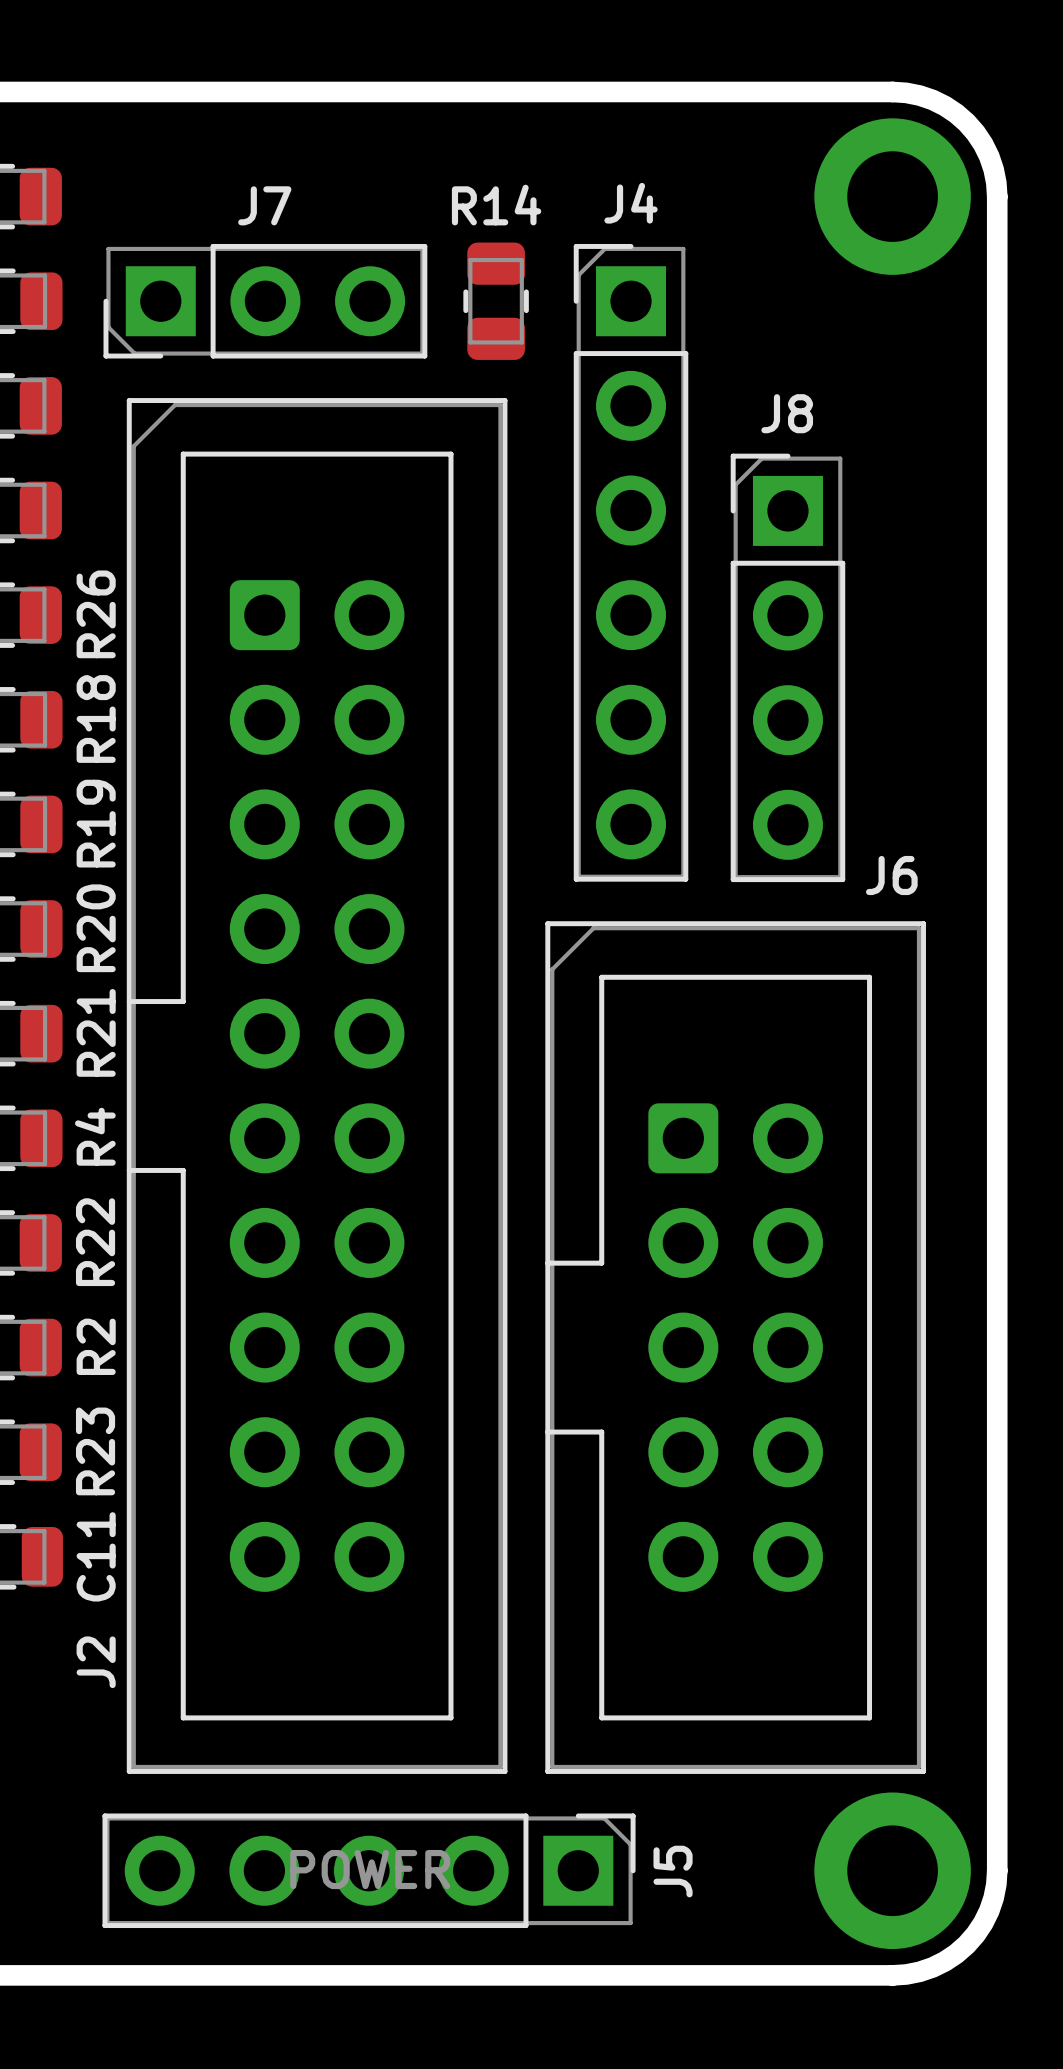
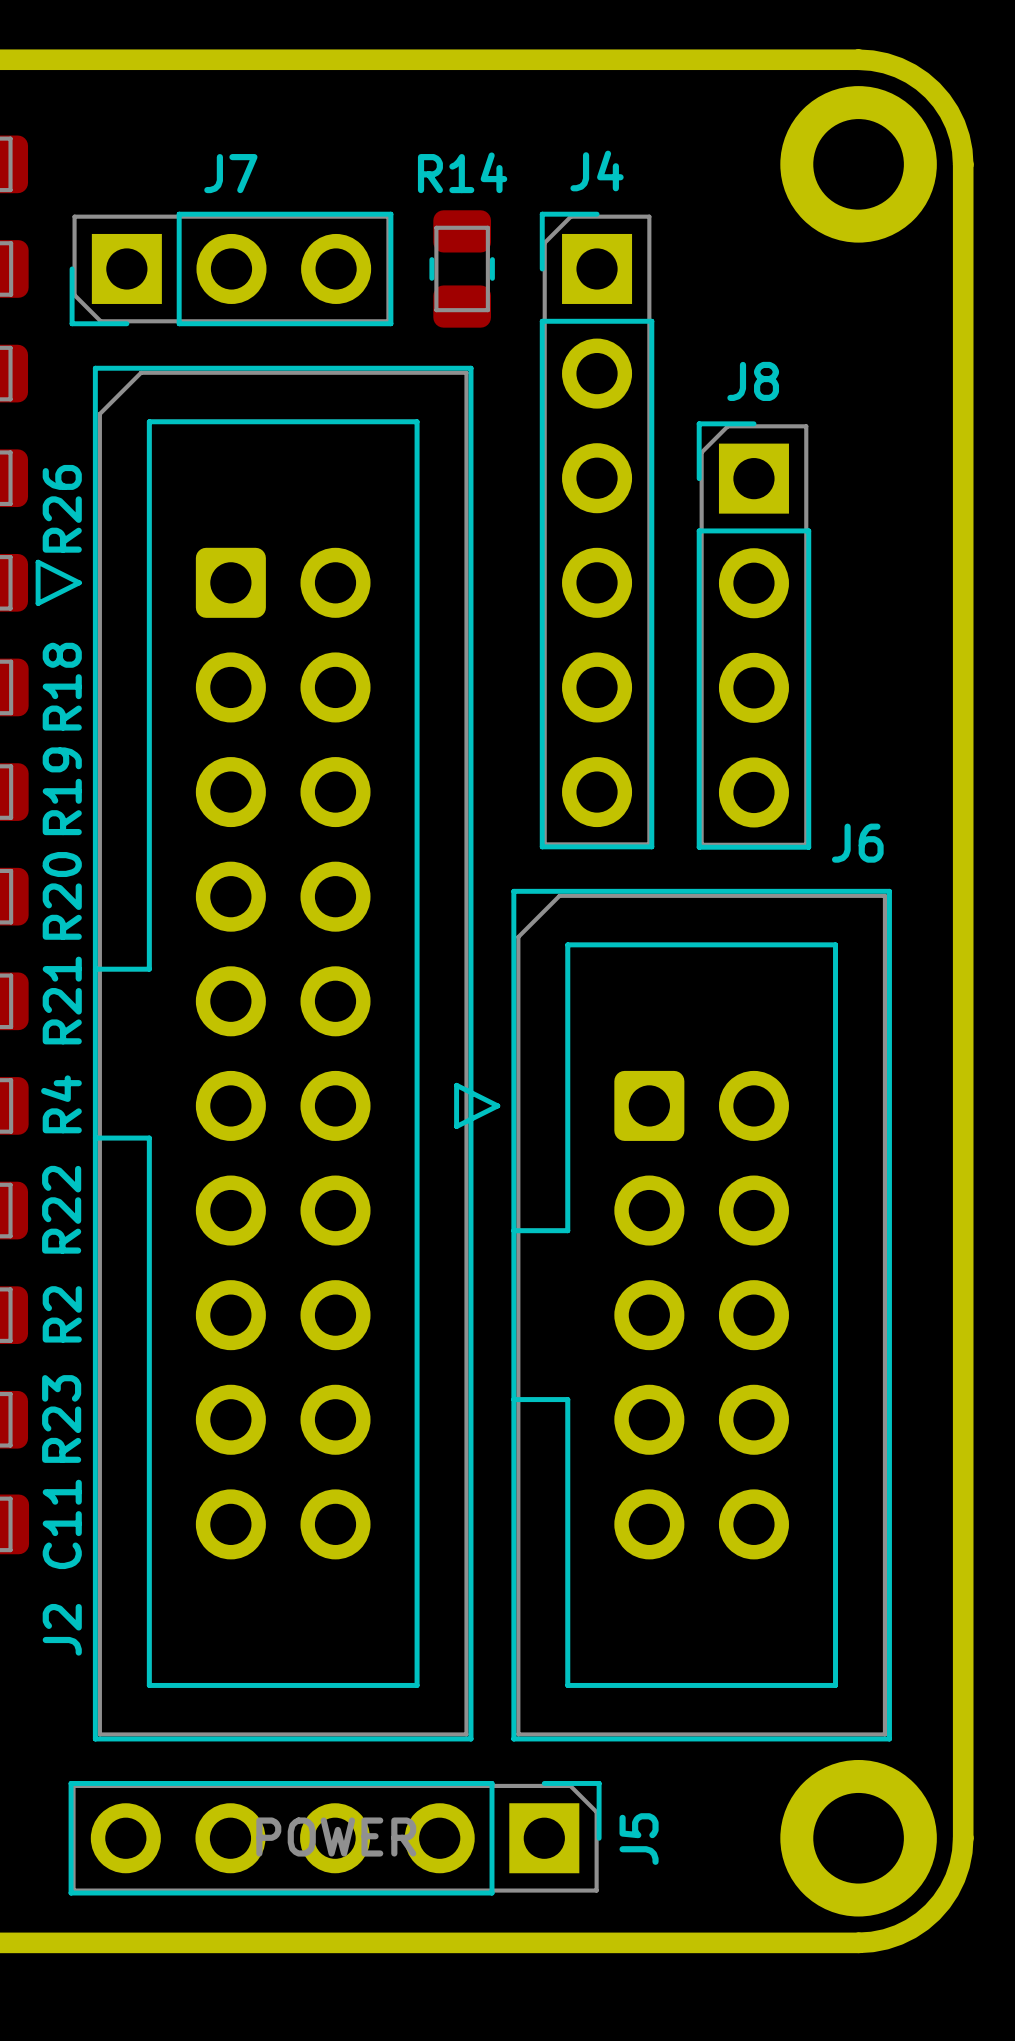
J2 footprint: [126, 398, 508, 1774] -> [35, 365, 474, 1742]
R26 name position: R26 (96, 614) -> R26 (62, 508)
J6 footprint: [545, 921, 926, 1774] -> [454, 888, 892, 1742]

